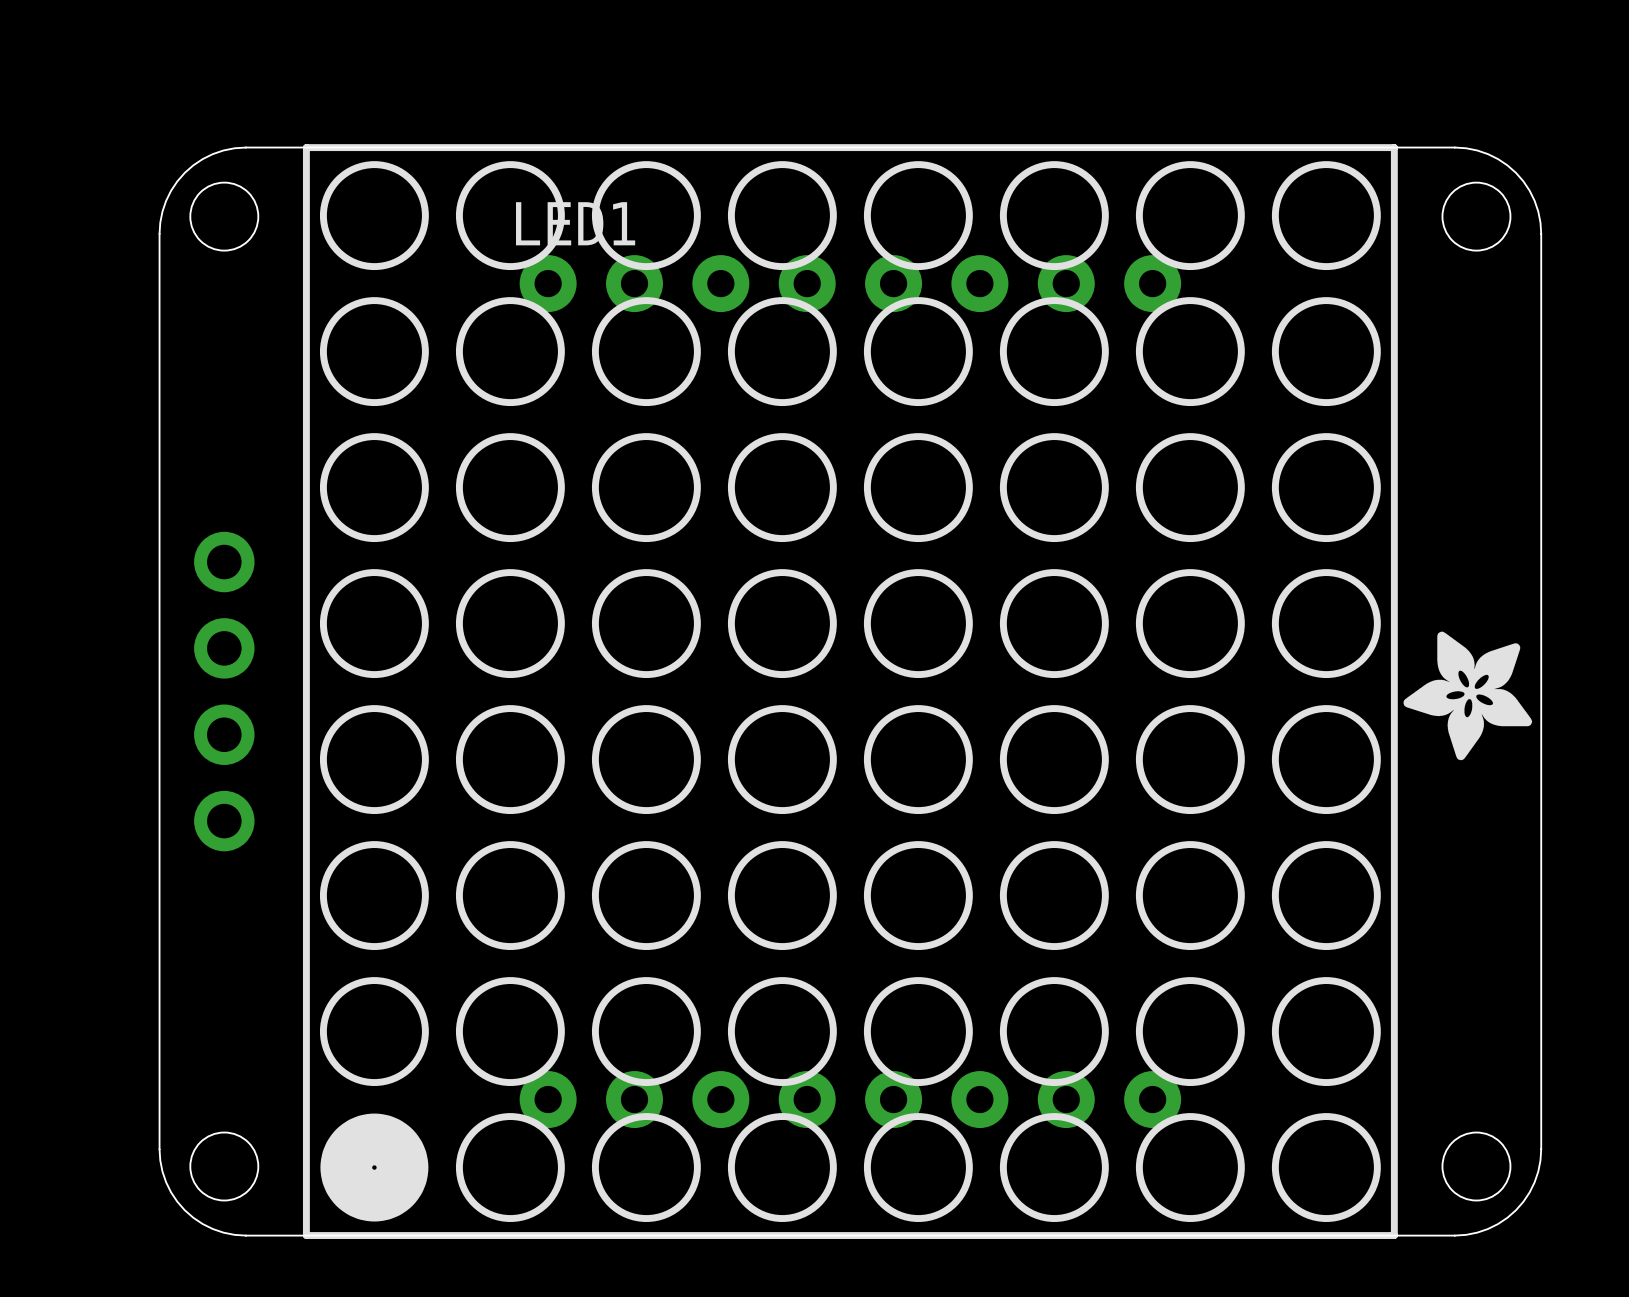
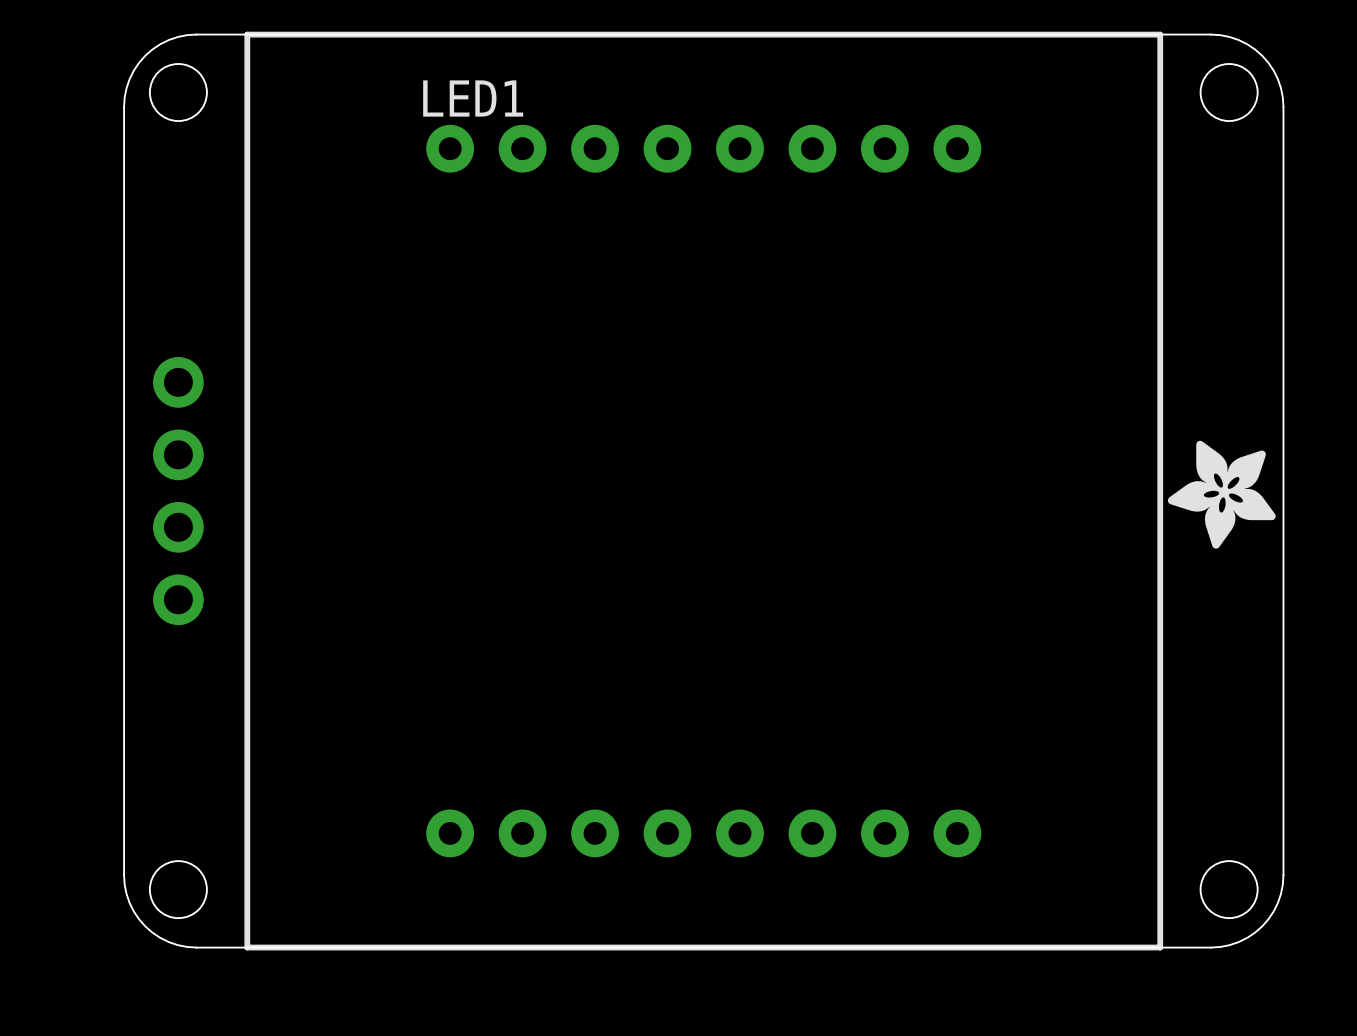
LED1 footprint: [302, 144, 1398, 1239] -> [244, 31, 1164, 951]

